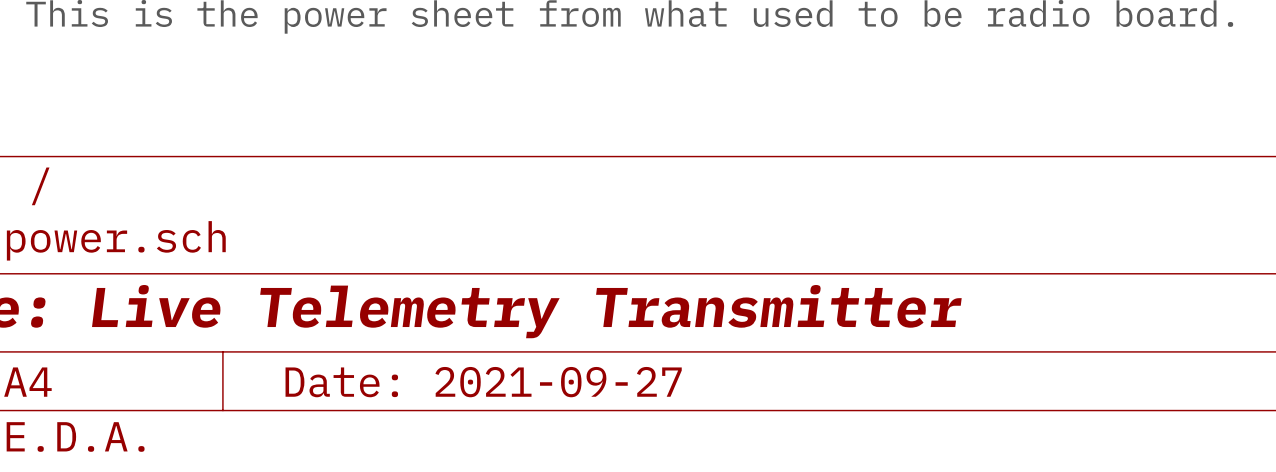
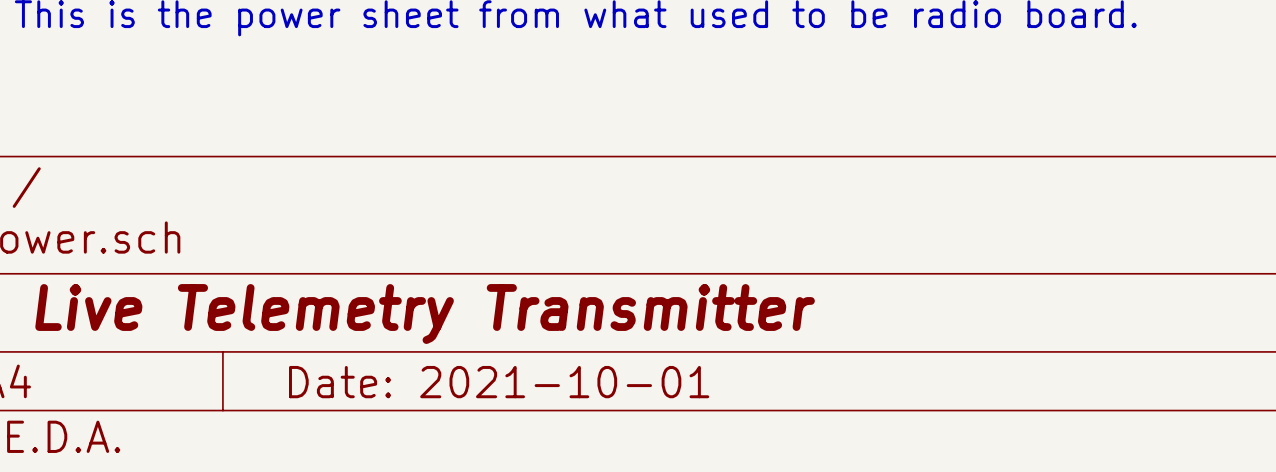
title block: Date: 2021-09-27 (483, 382) -> Date: 2021-10-01 (499, 382)

